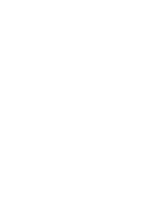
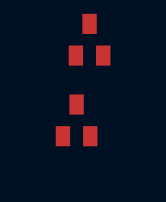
part: none -> (89, 39)
part: none -> (76, 120)

